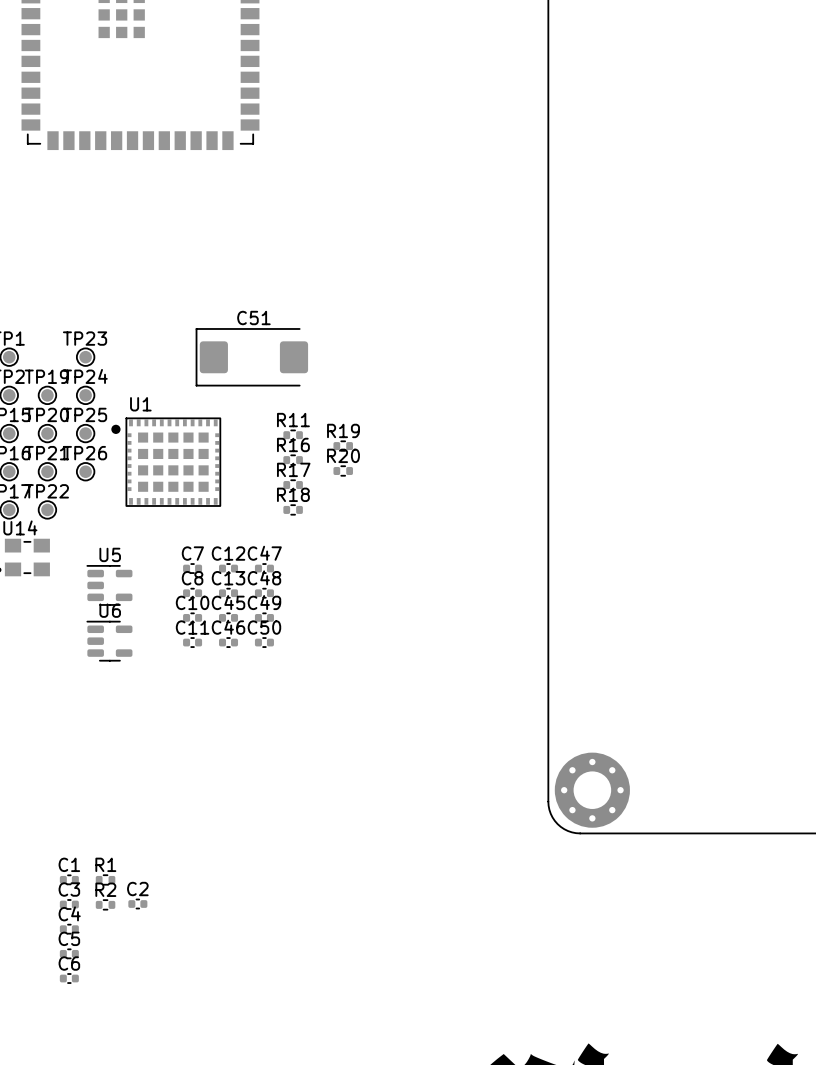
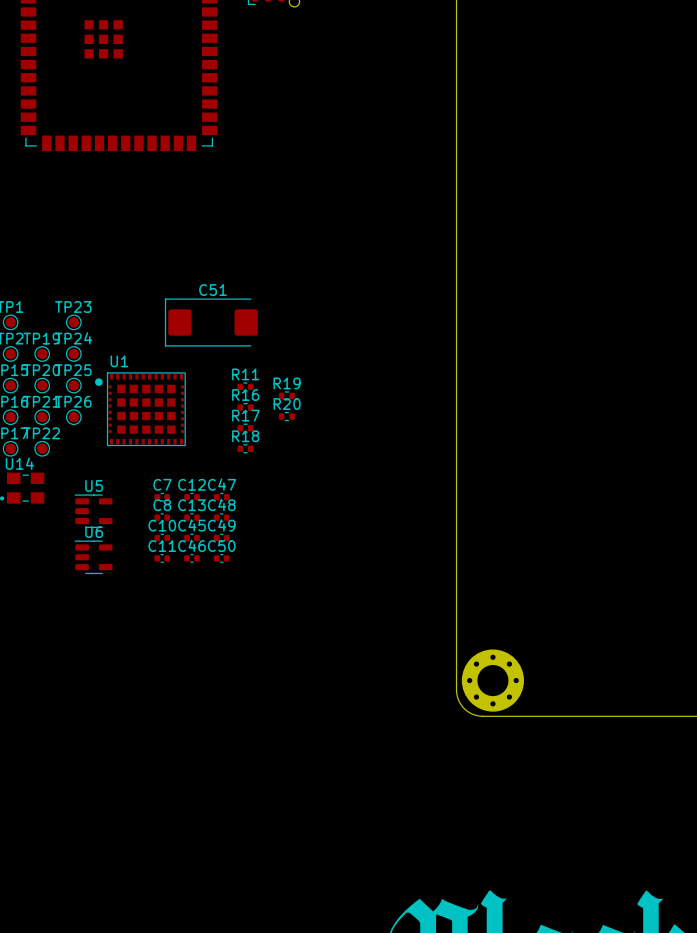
C1: (69, 879) -> none
R1: (105, 879) -> none
C3: (69, 904) -> none
R2: (105, 904) -> none
C2: (137, 904) -> none
C4: (69, 929) -> none
C5: (69, 953) -> none
C6: (69, 978) -> none

